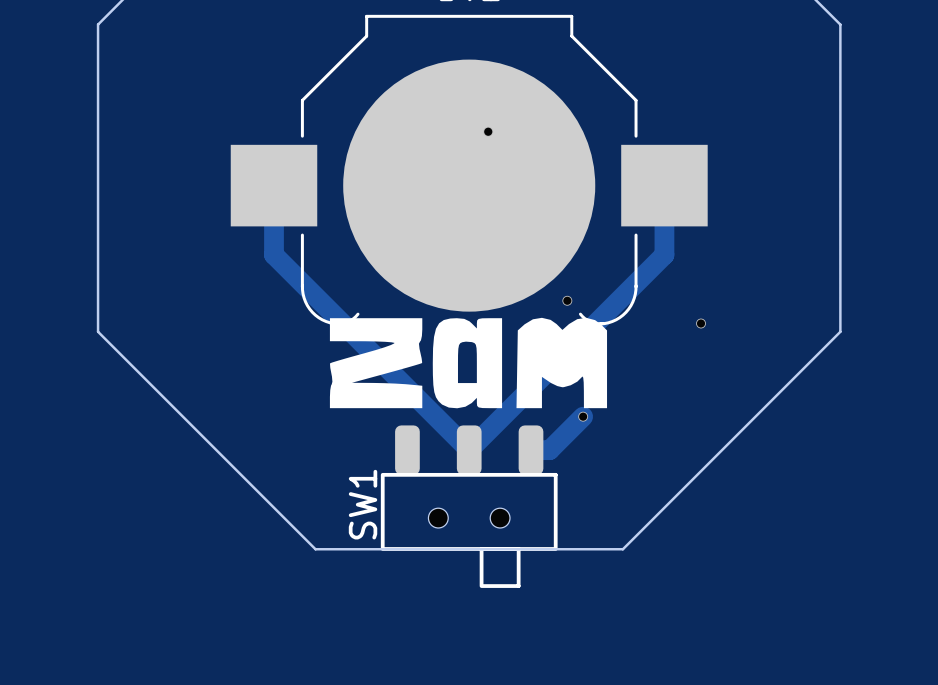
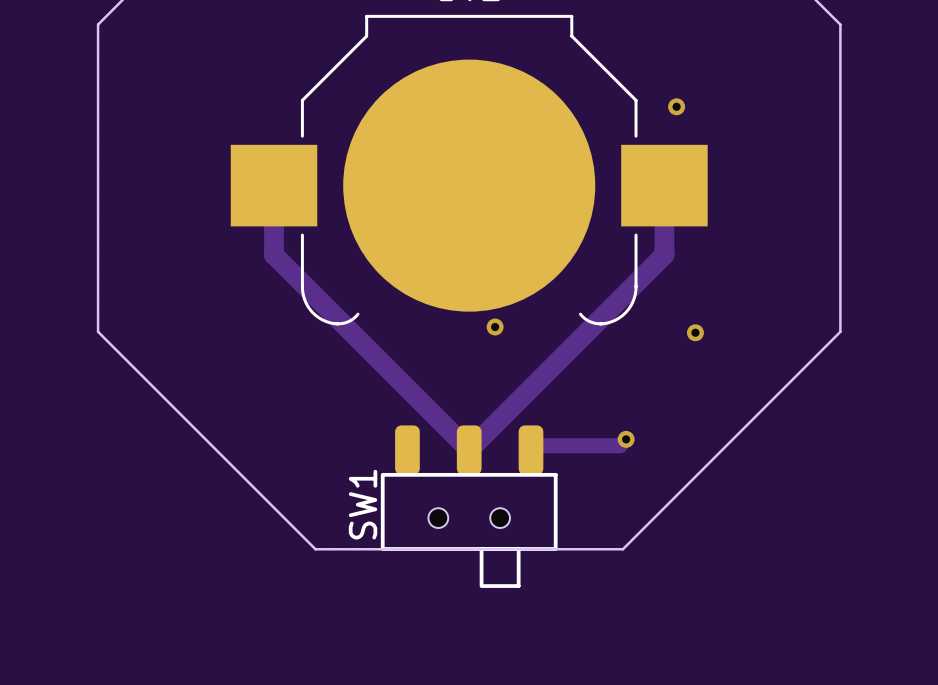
via: none -> (676, 106)
via: (488, 131) -> none
via: (567, 300) -> none
drawing: [329, 317, 608, 409] -> none
via size: [696, 318, 706, 329] -> [686, 324, 704, 342]
via: none -> (495, 327)
track: (583, 416) (549, 450) (531, 450) -> none
via: (583, 416) -> none
track: none -> (626, 439) (619, 445) (531, 445)
via: none -> (626, 439)

